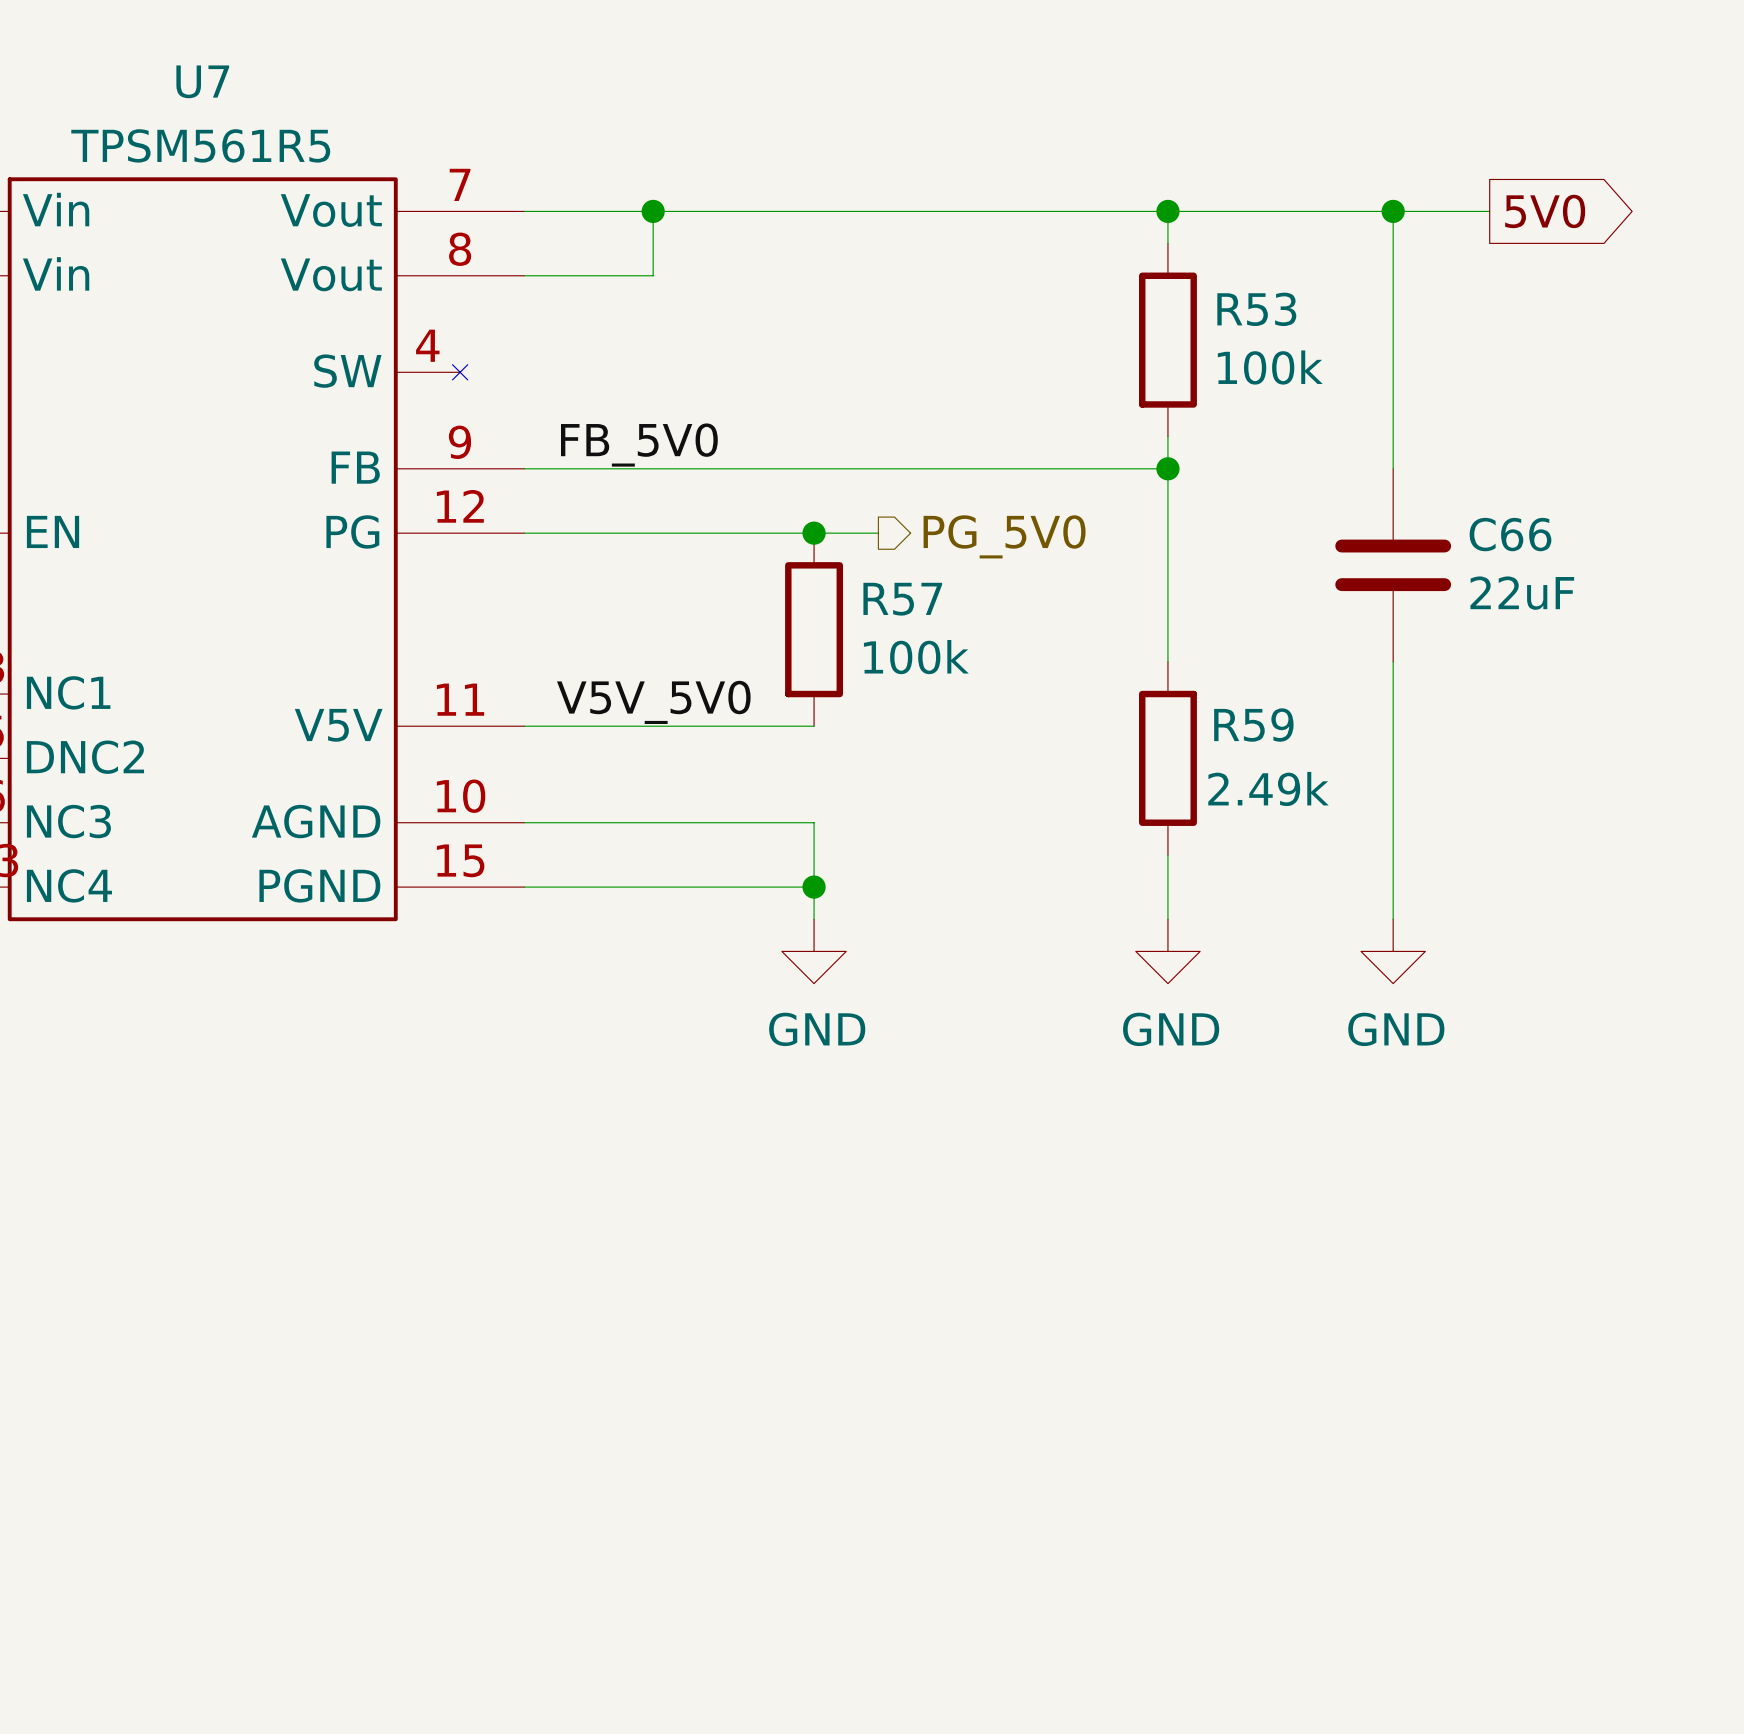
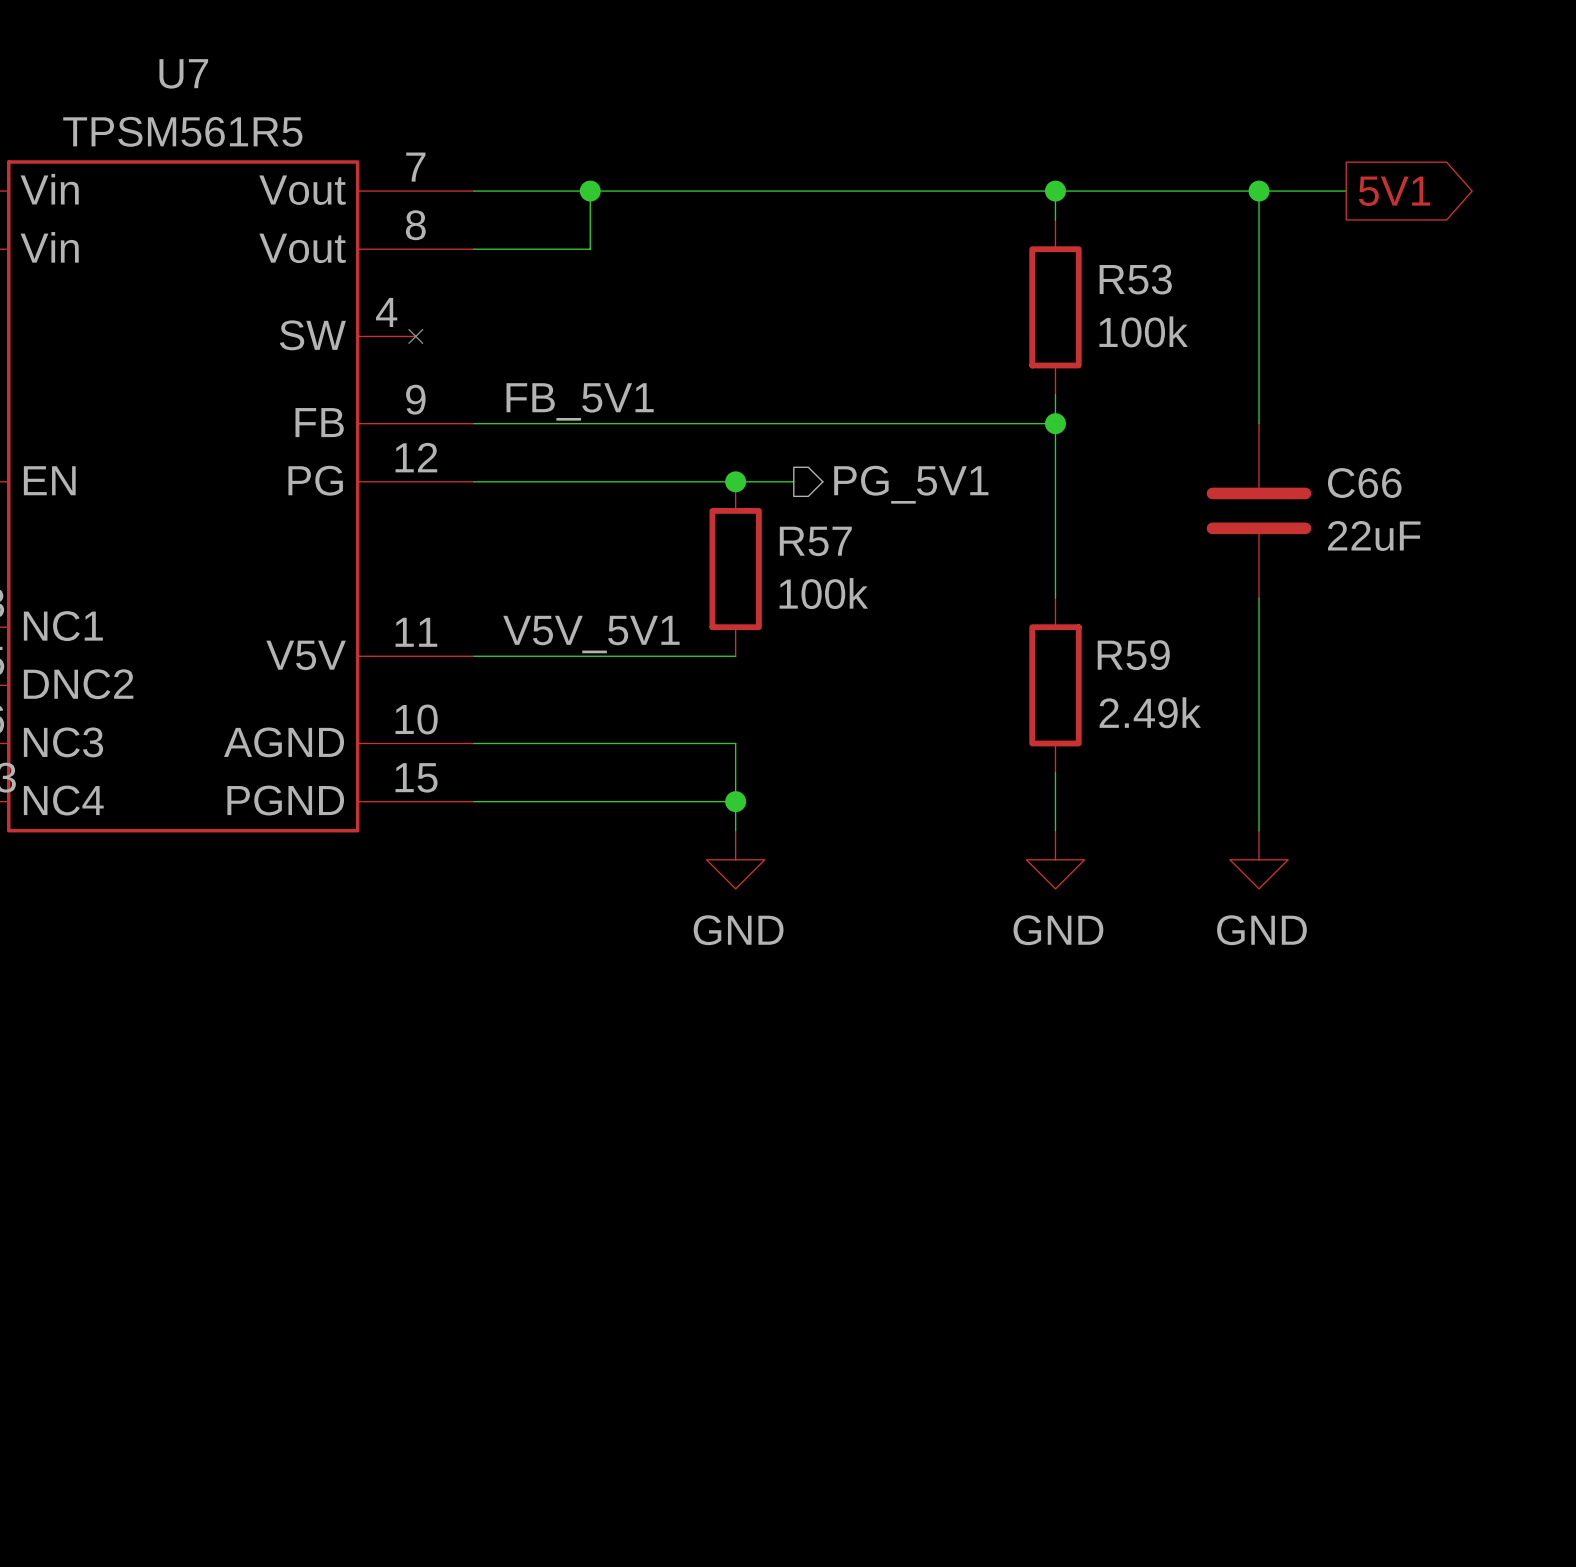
global label: 5V0 (1545, 211) -> 5V1 (1394, 191)
label: FB_5V0 (639, 445) -> FB_5V1 (580, 401)
hierarchical label: PG_5V0 (1004, 536) -> PG_5V1 (911, 484)
label: V5V_5V0 (653, 702) -> V5V_5V1 (591, 634)

